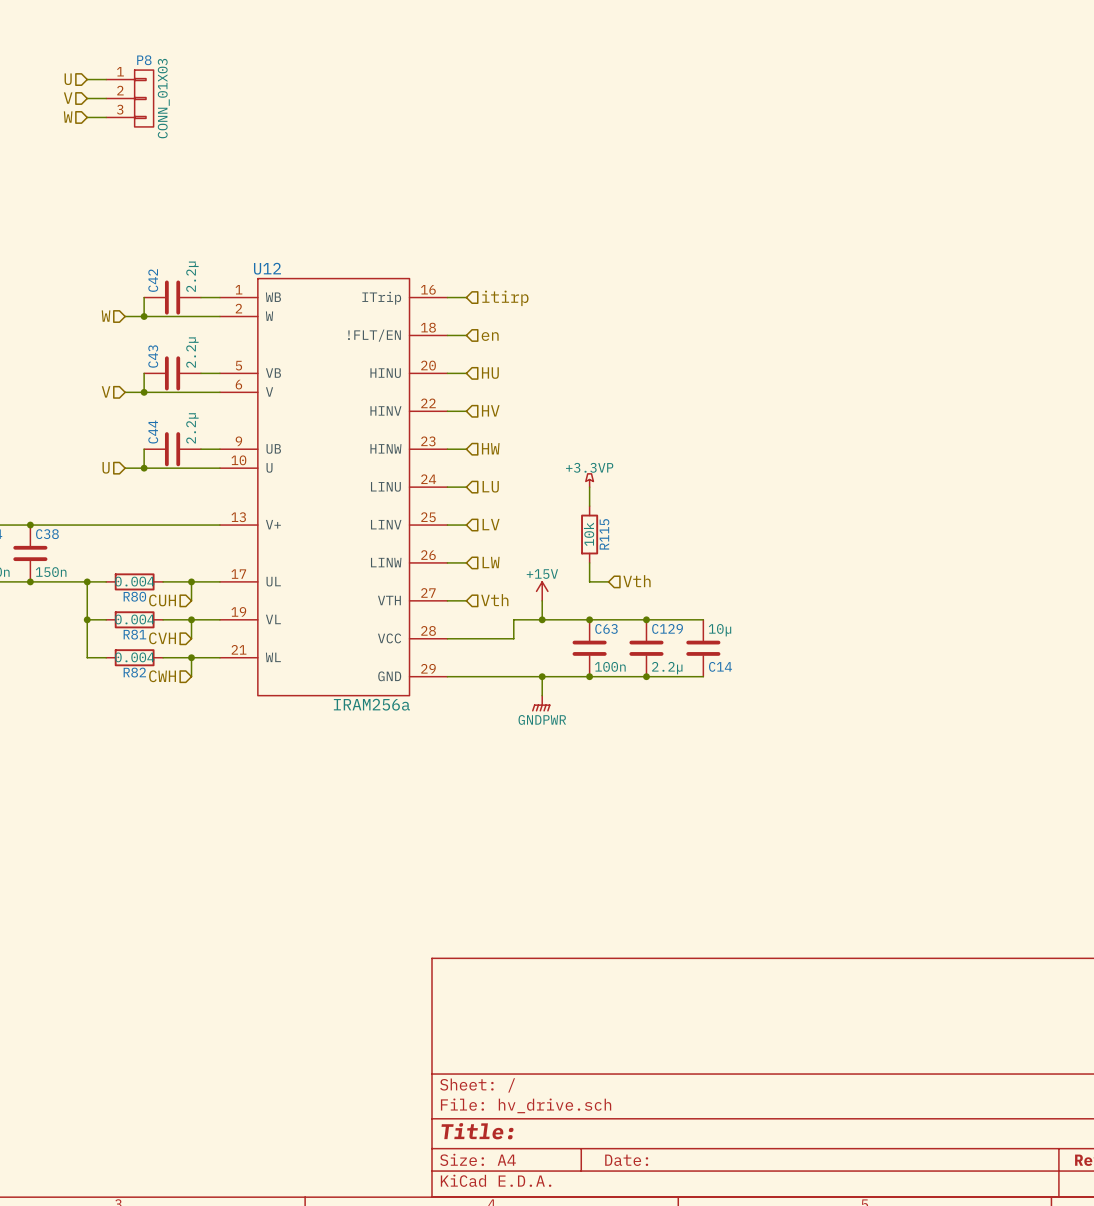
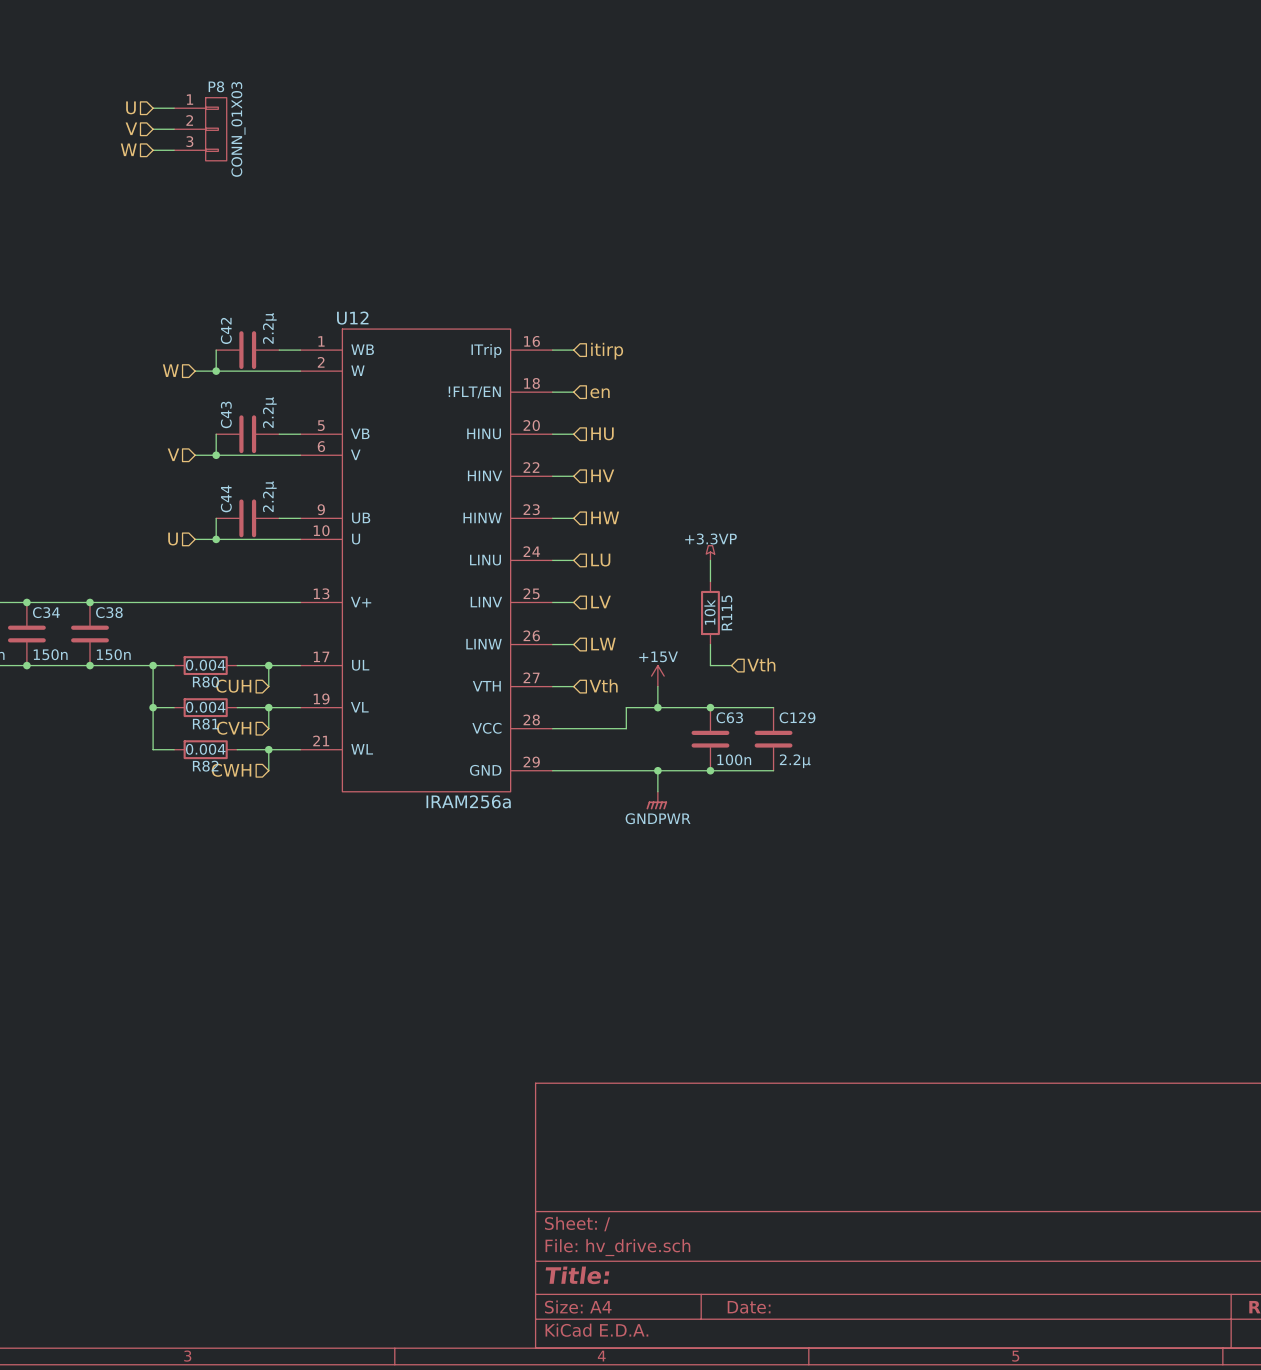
wire: (646, 619) (703, 619) -> none
junction: (646, 619) -> none
C14: 10µ (703, 648) -> none
wire: (646, 676) (703, 676) -> none
junction: (646, 676) -> none

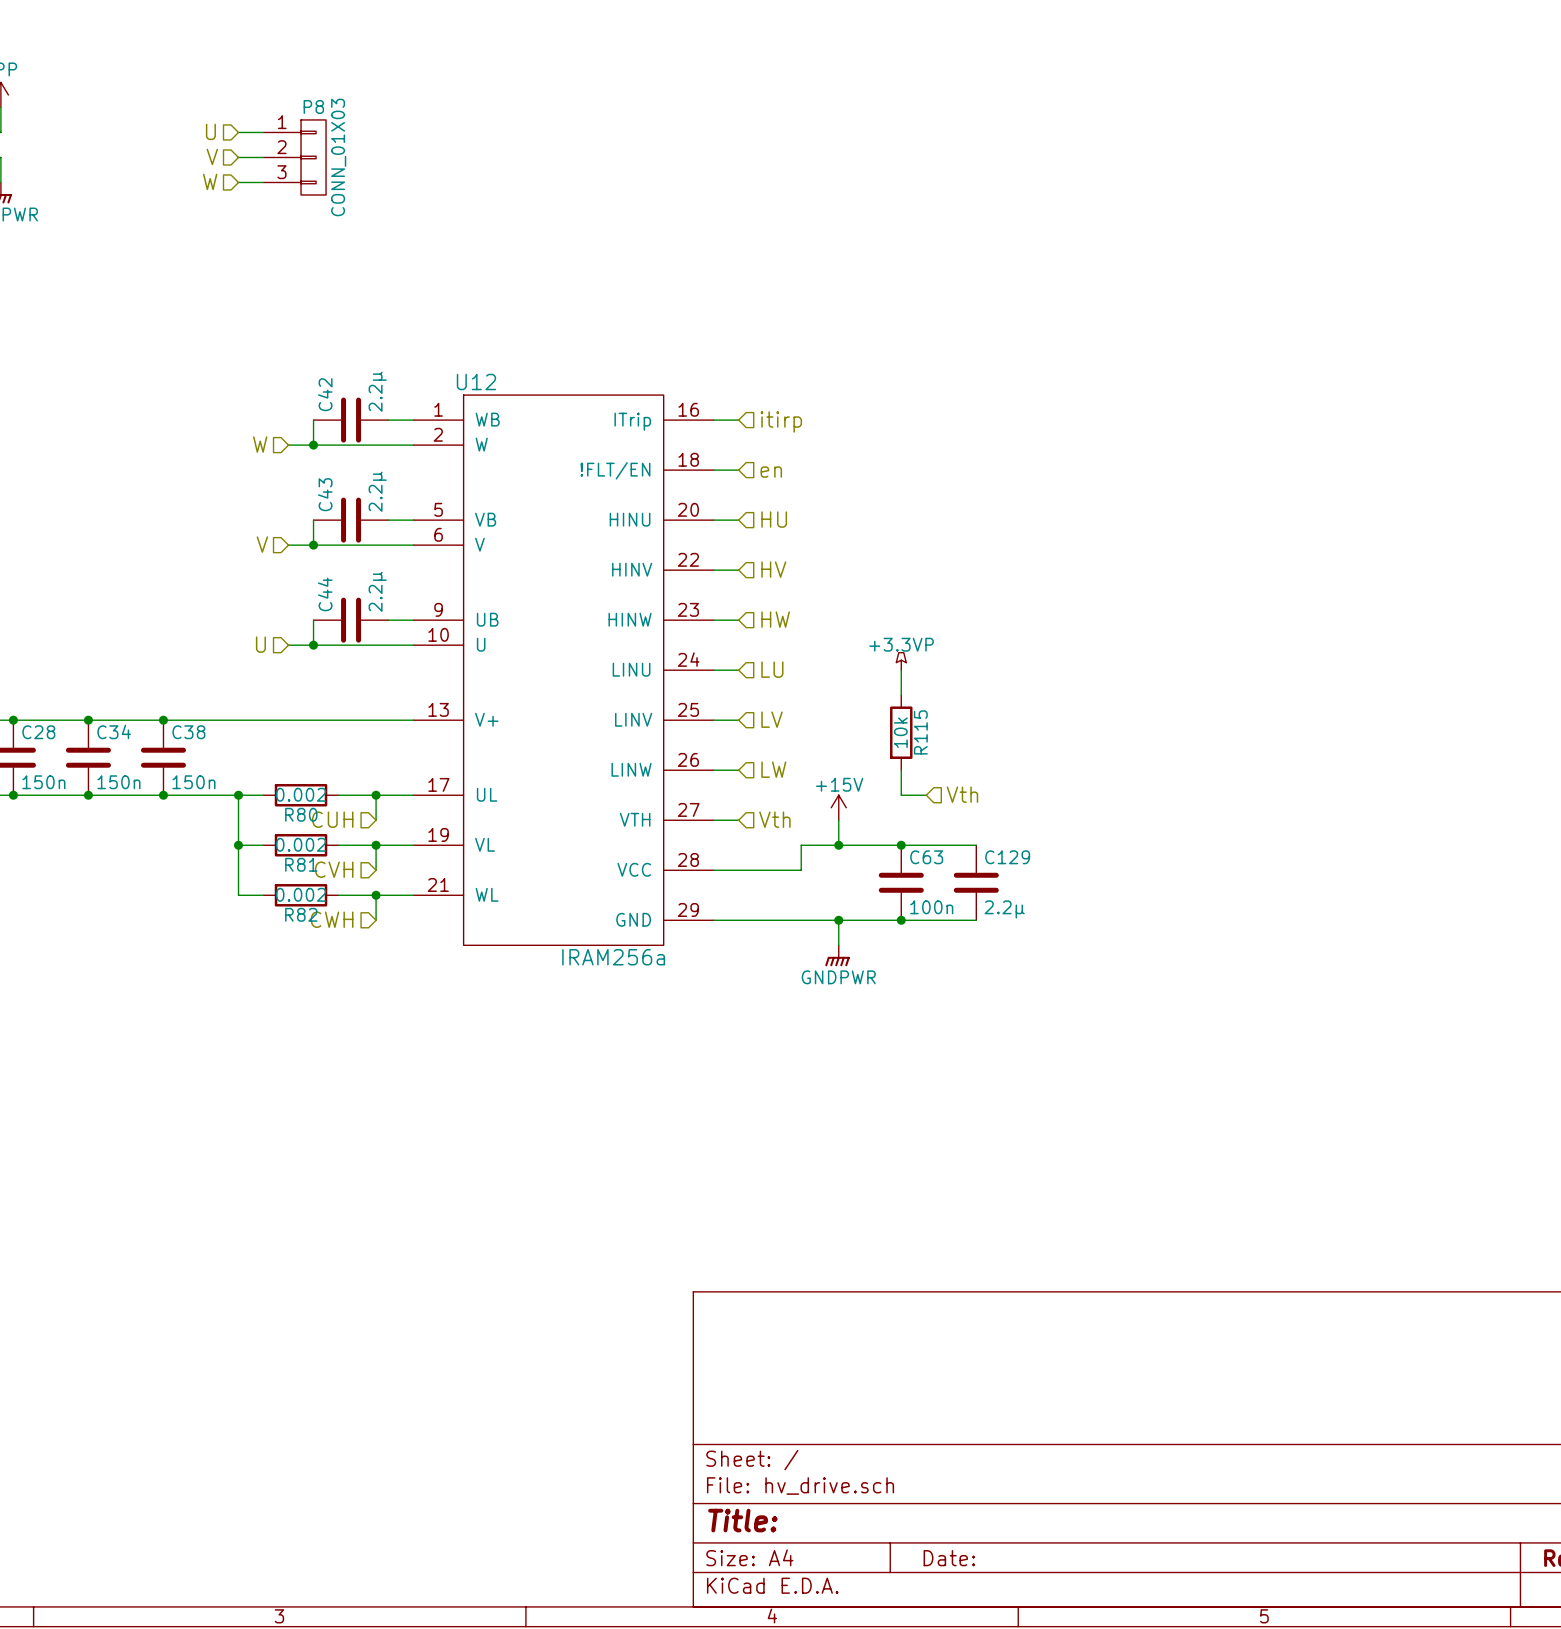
R80 value: 0.004 (205, 665) -> 0.002 (301, 794)
R81 value: 0.004 (205, 707) -> 0.002 (301, 844)
R82 value: 0.004 (205, 749) -> 0.002 (301, 894)

